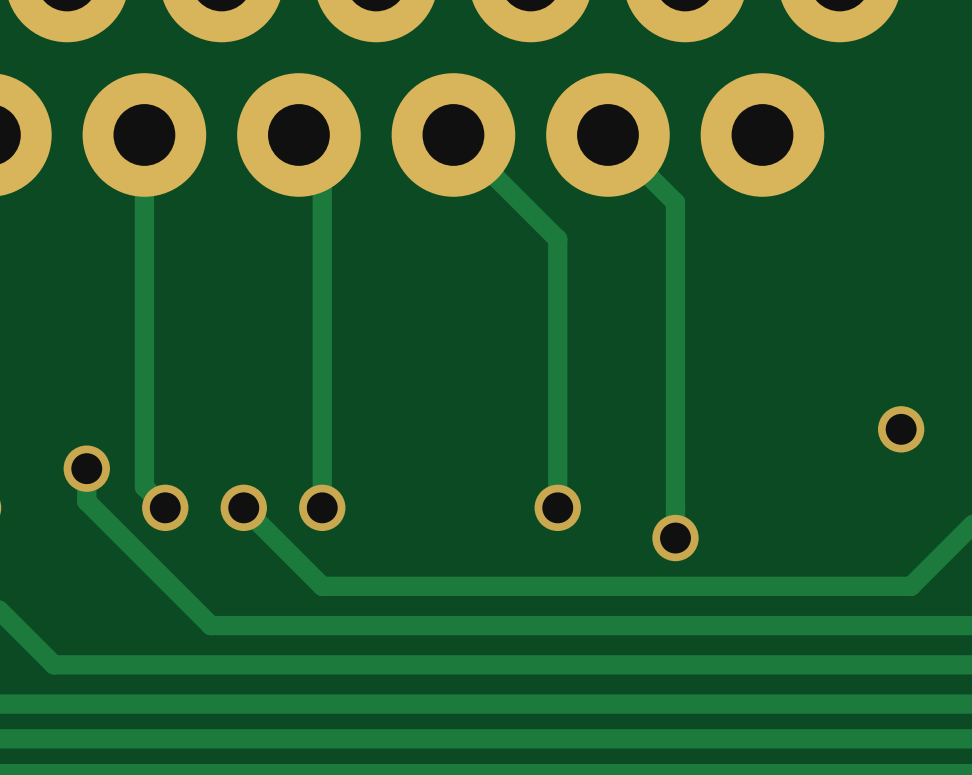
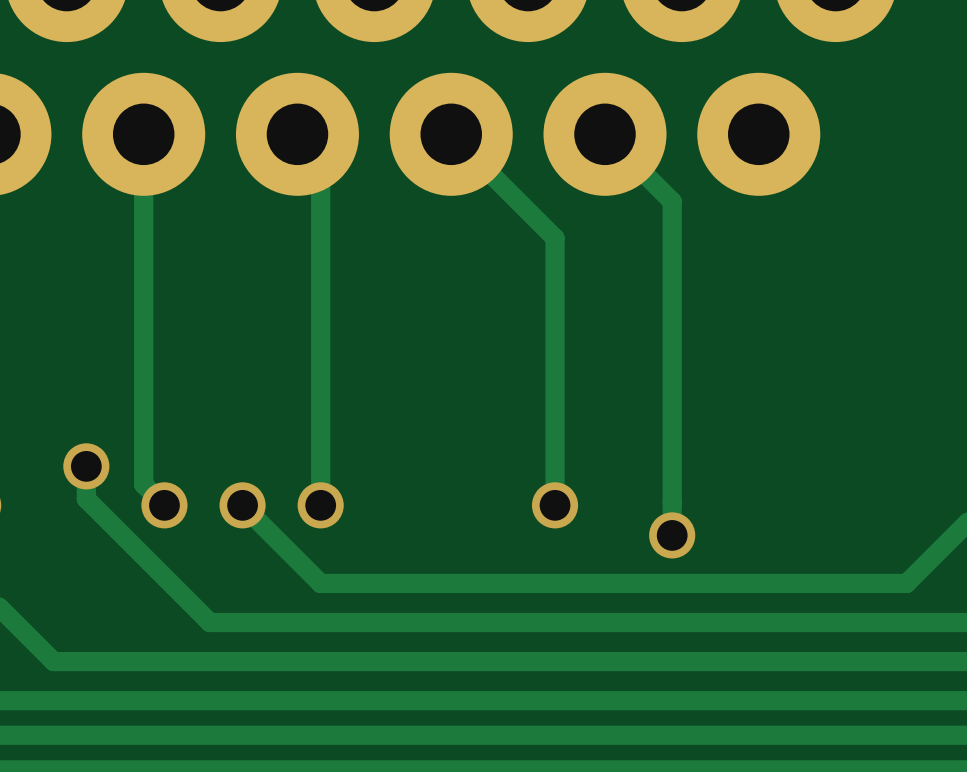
via: (901, 429) -> none

